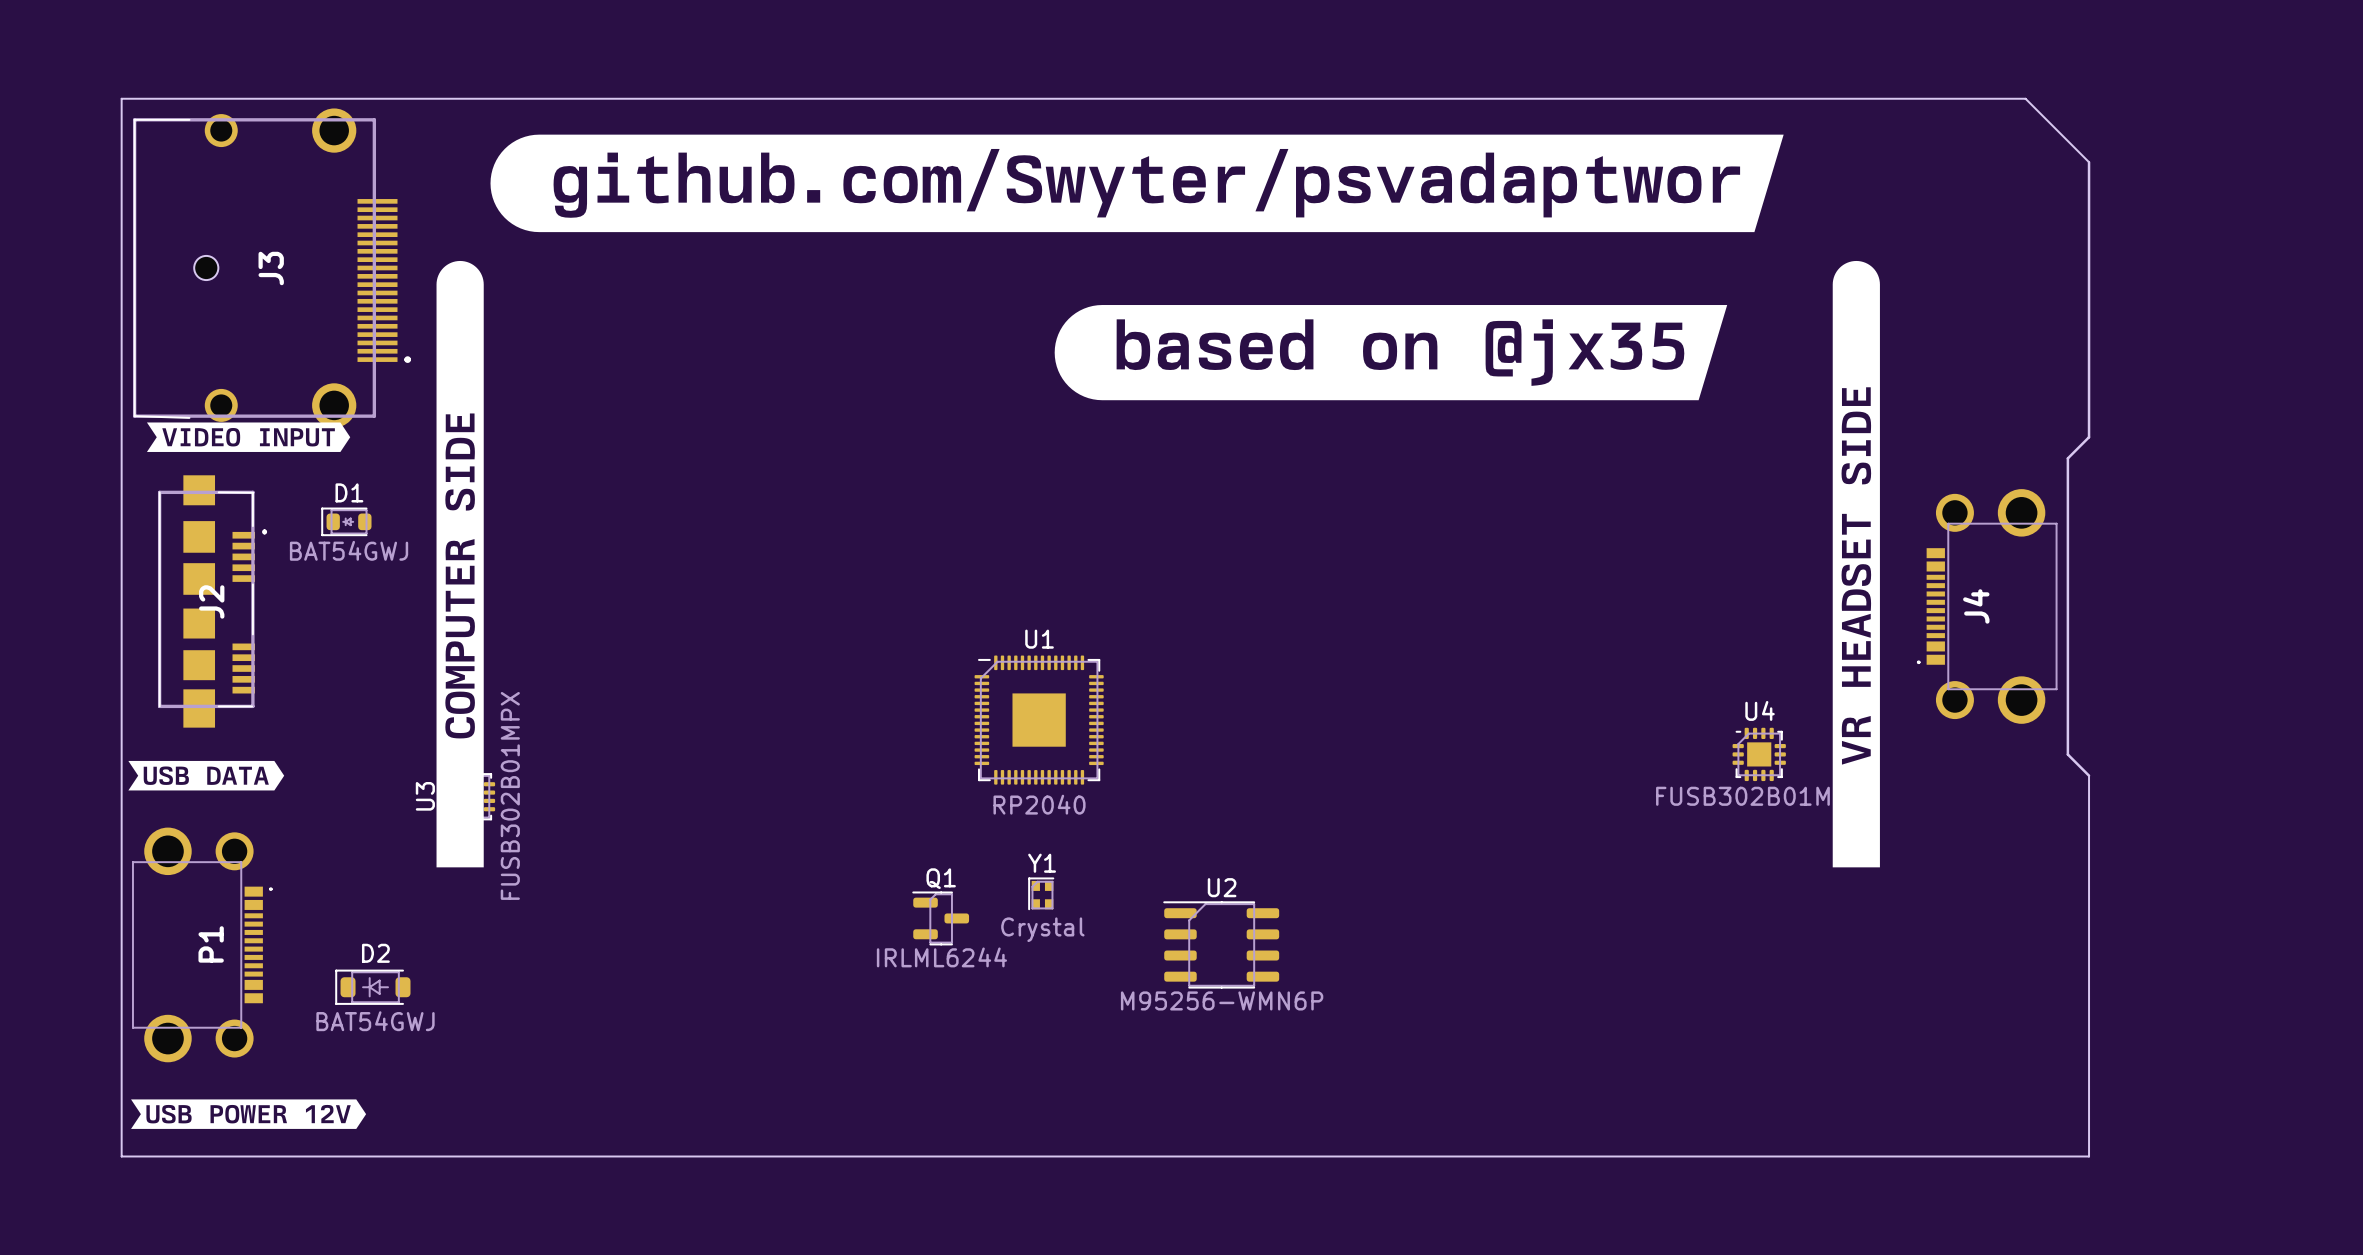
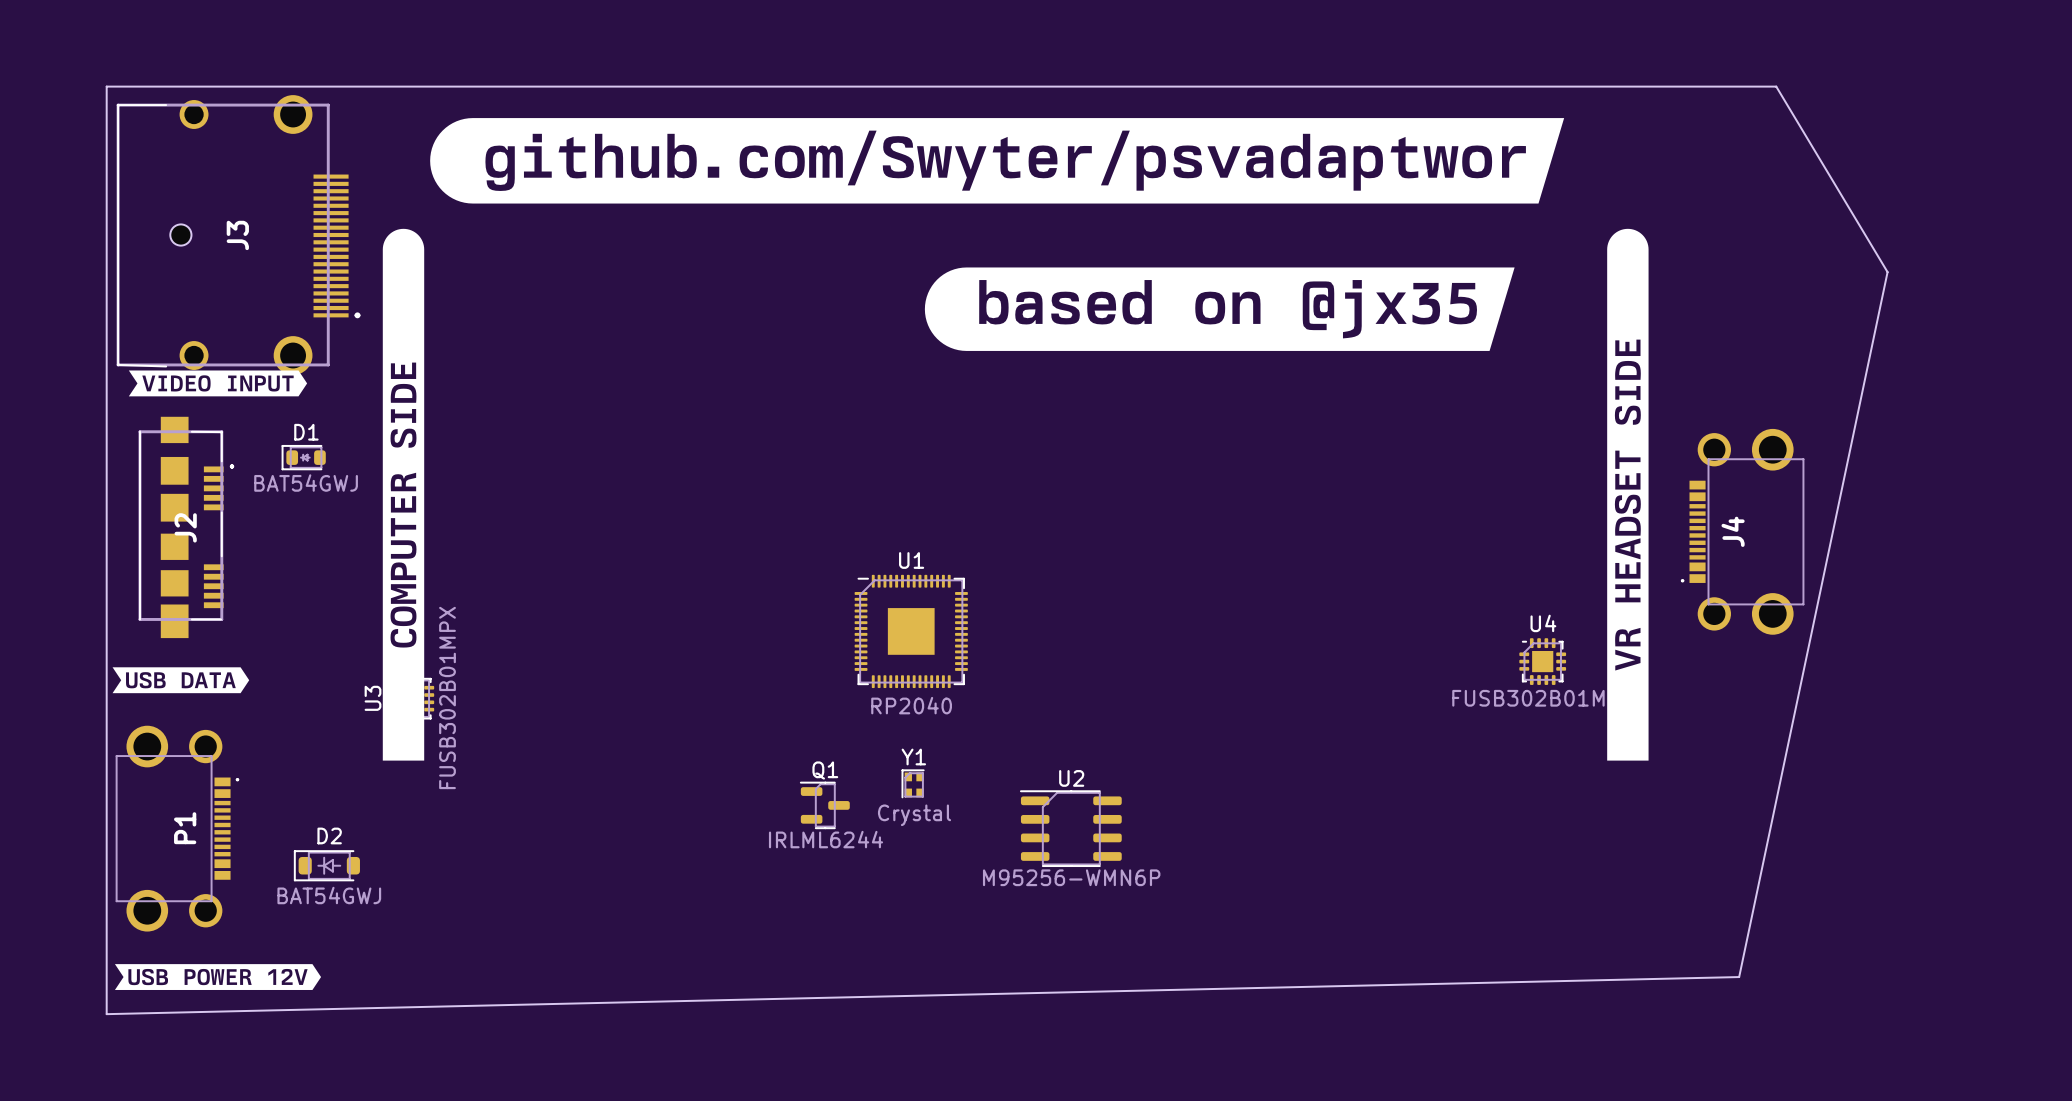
board edge: (2025, 98) (2089, 162) (2089, 437) (2067, 458) (2067, 754) (2089, 775) (2089, 1156) (121, 1156) -> (1776, 86) (1887, 272) (1739, 977) (106, 1014)

